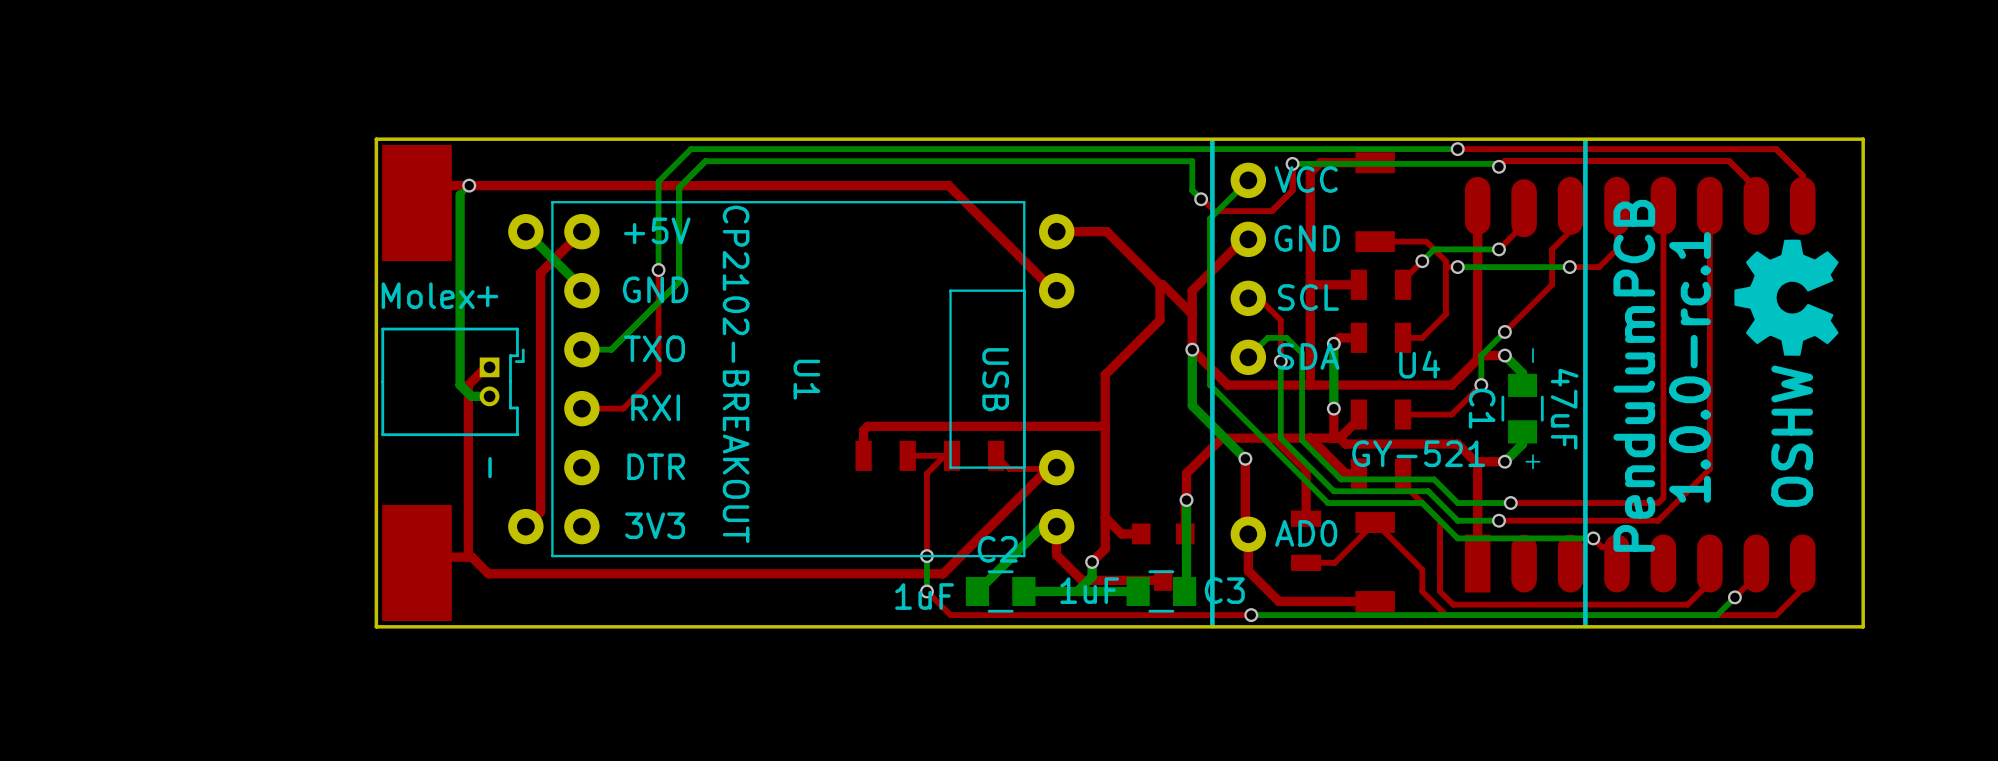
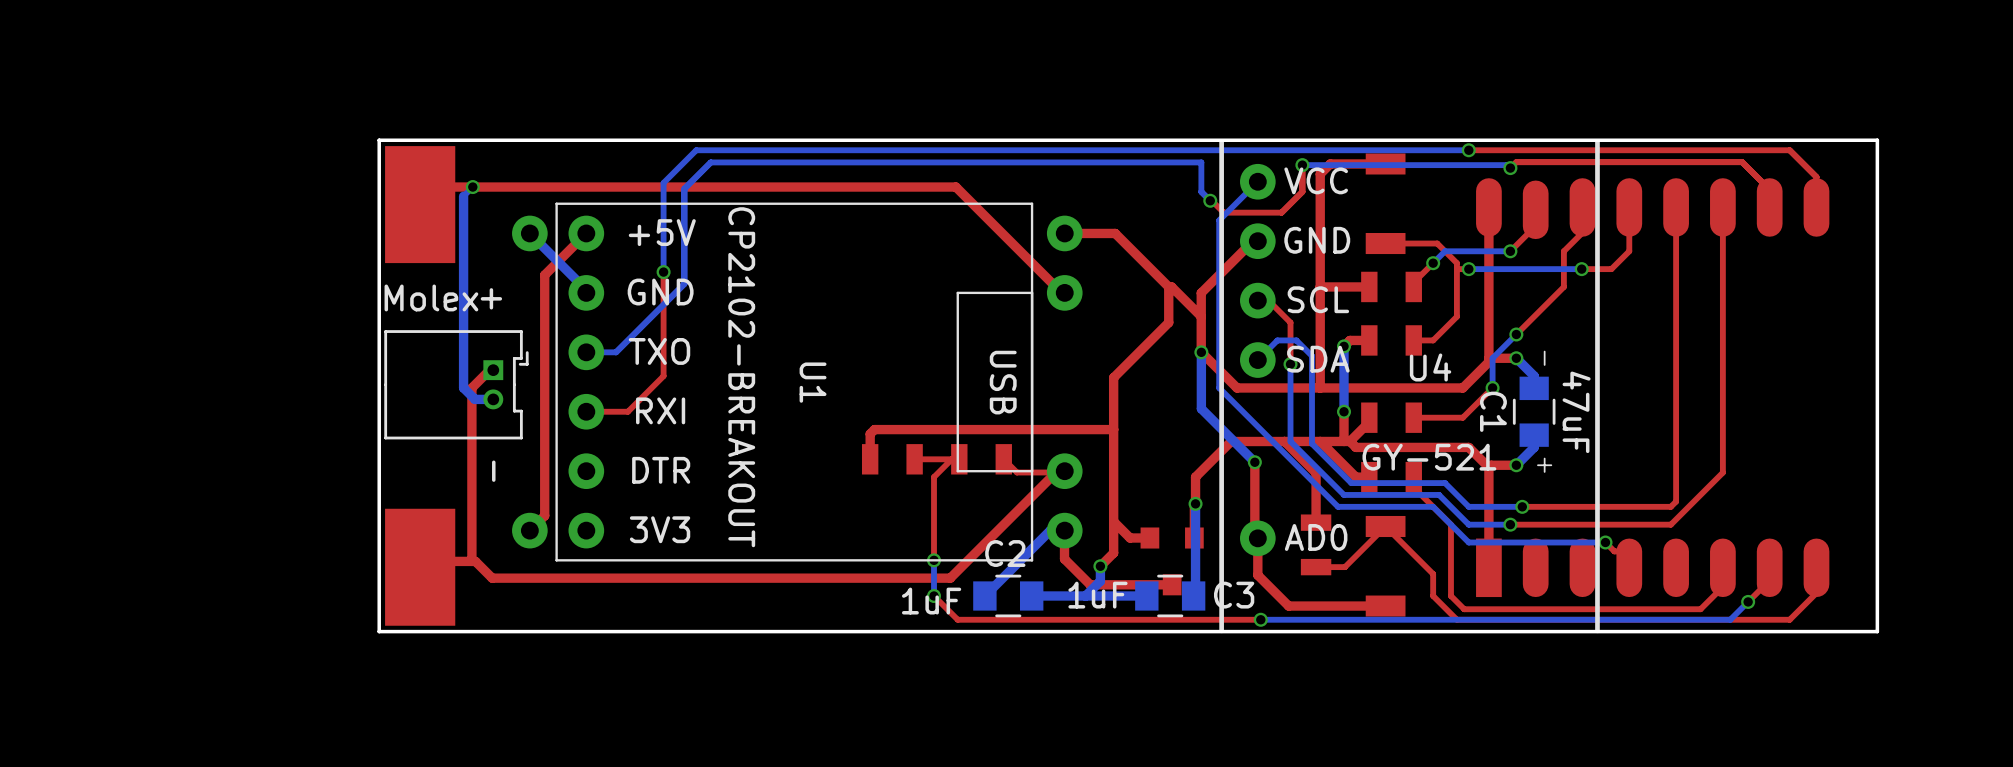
drawing: [1734, 239, 1839, 356] -> none
text: 1.0.0-rc.1 (1690, 367) -> none
text: PendulumPCB (1634, 375) -> none
text: OSHW (1792, 436) -> none

